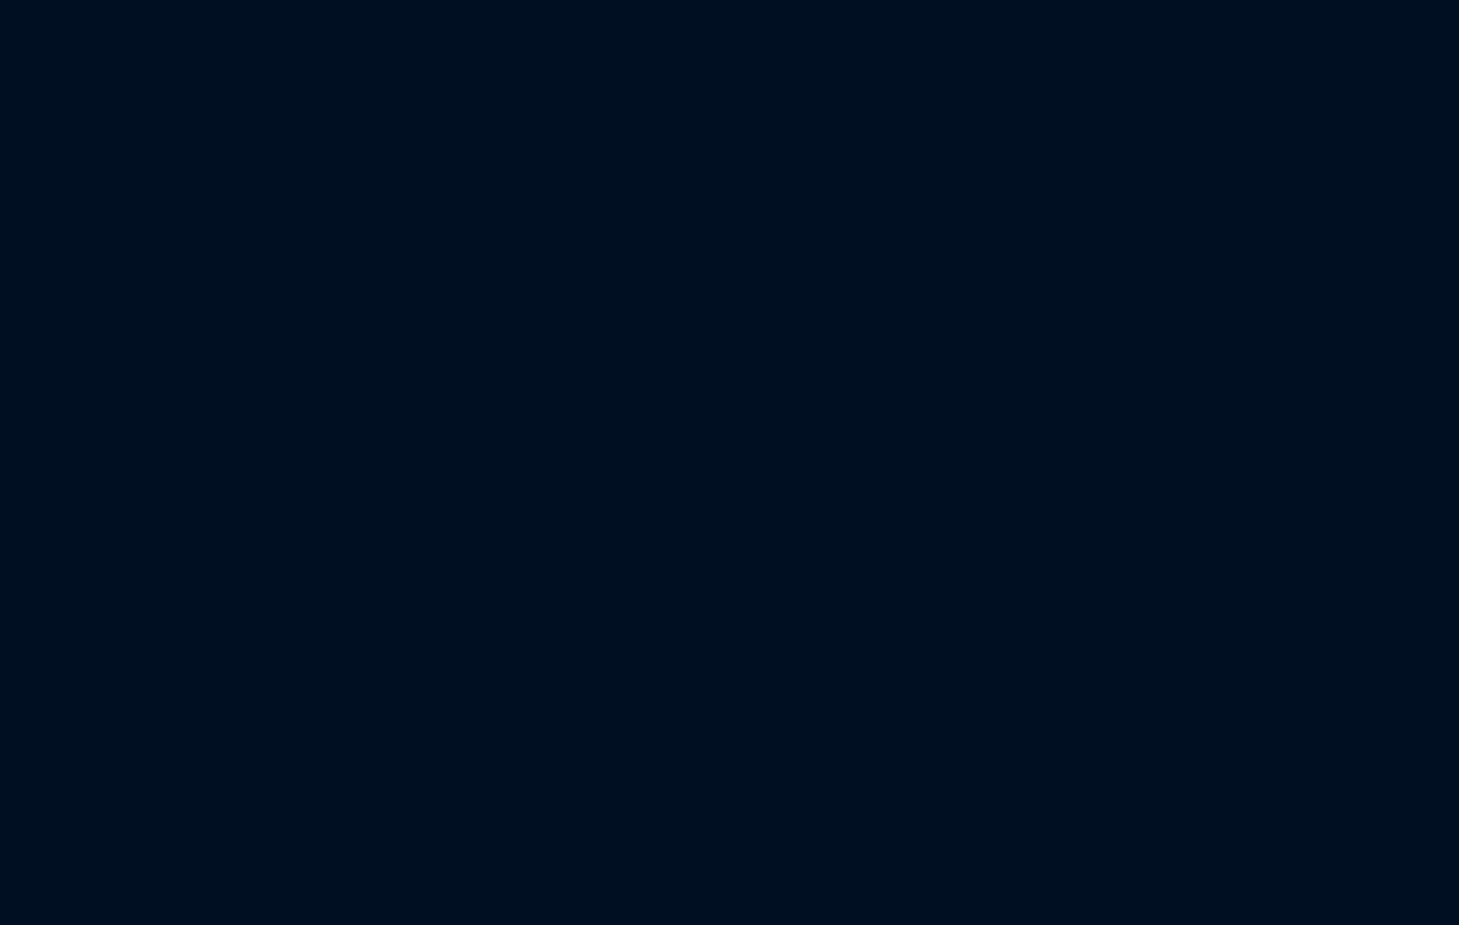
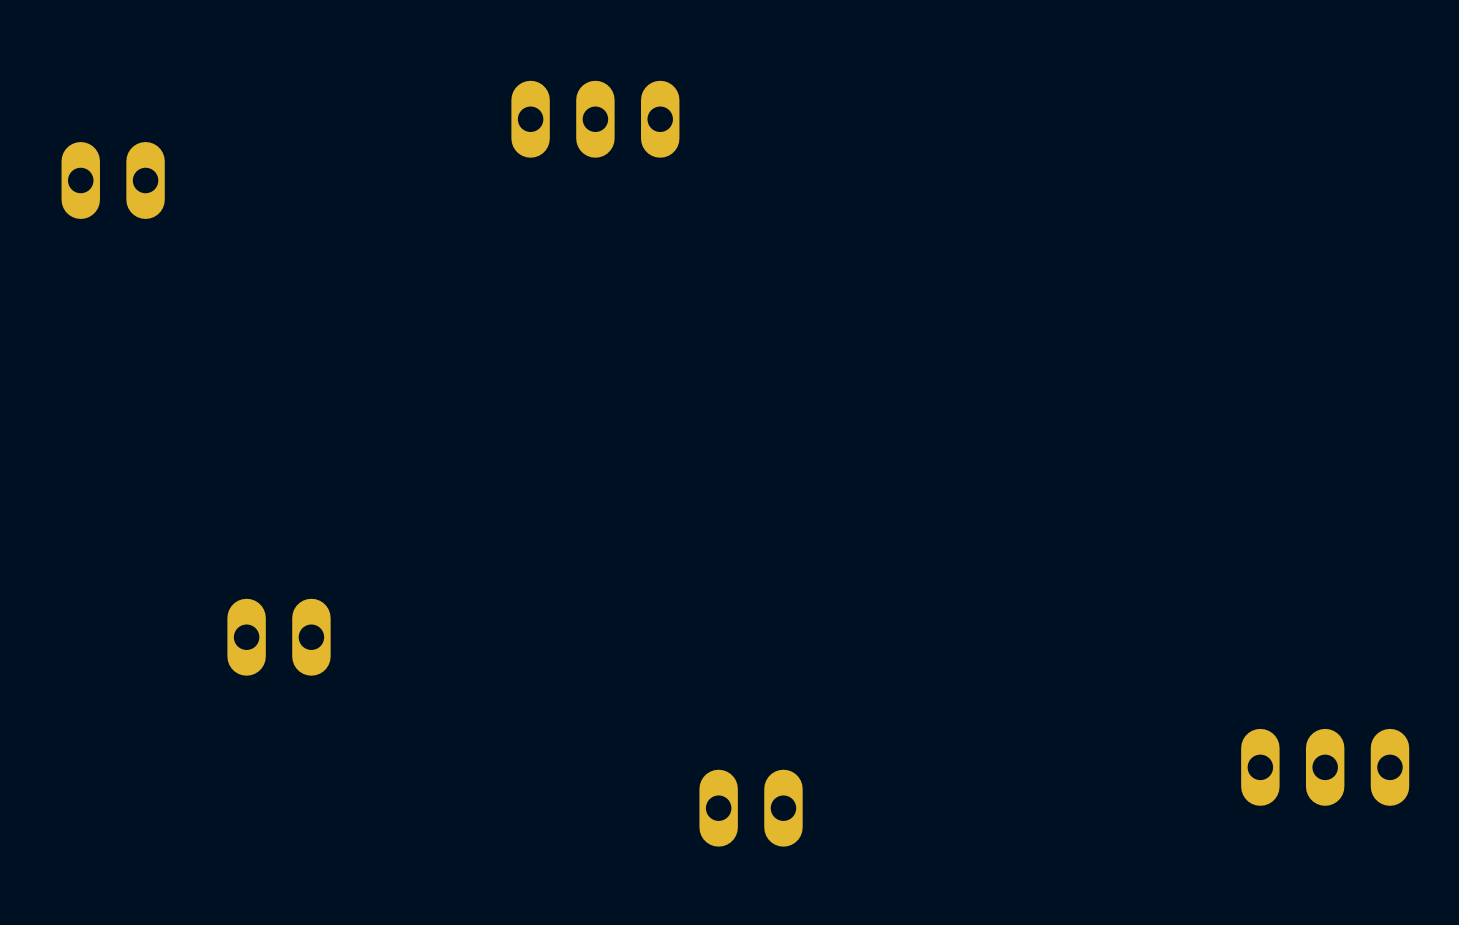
part: none -> (595, 119)
part: none -> (113, 180)
part: none -> (279, 637)
part: none -> (1325, 767)
part: none -> (751, 808)

